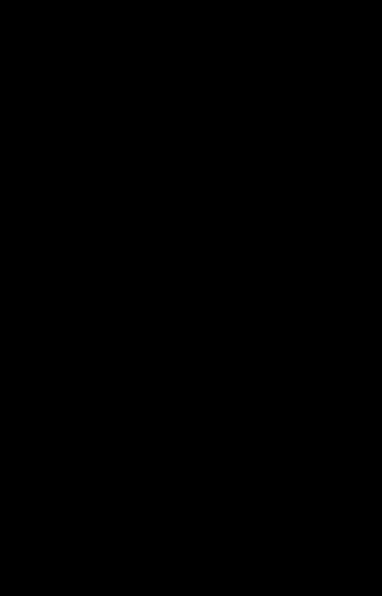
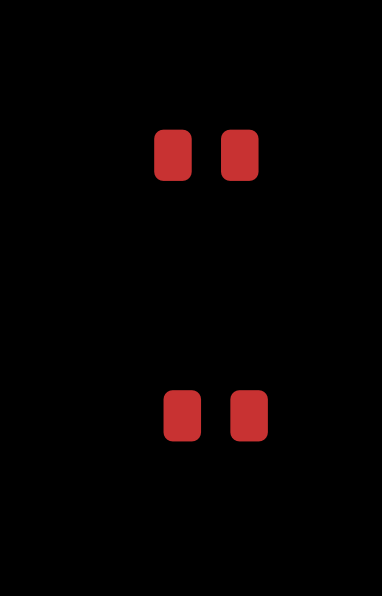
part: none -> (206, 155)
part: none -> (215, 415)

